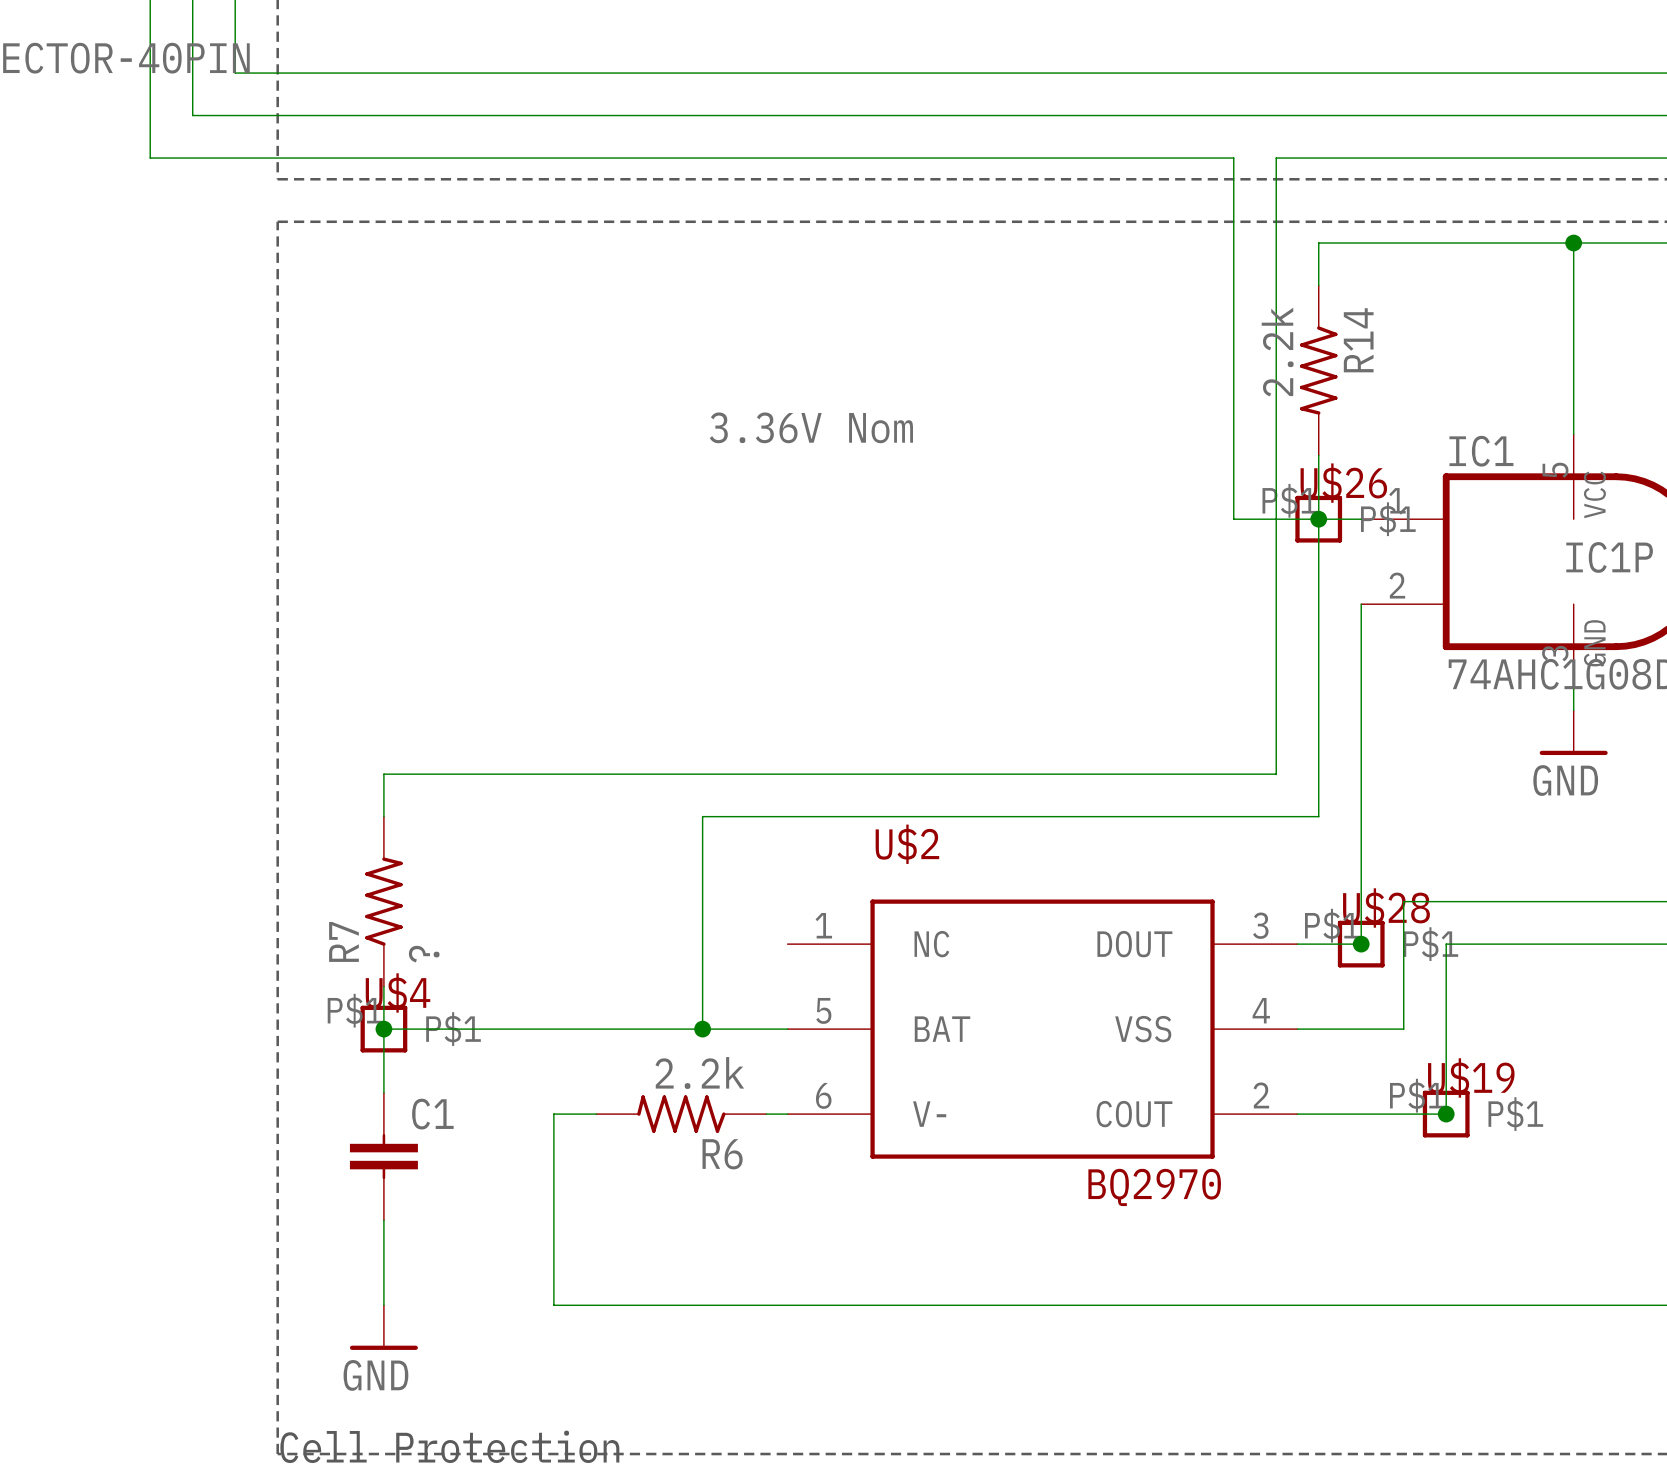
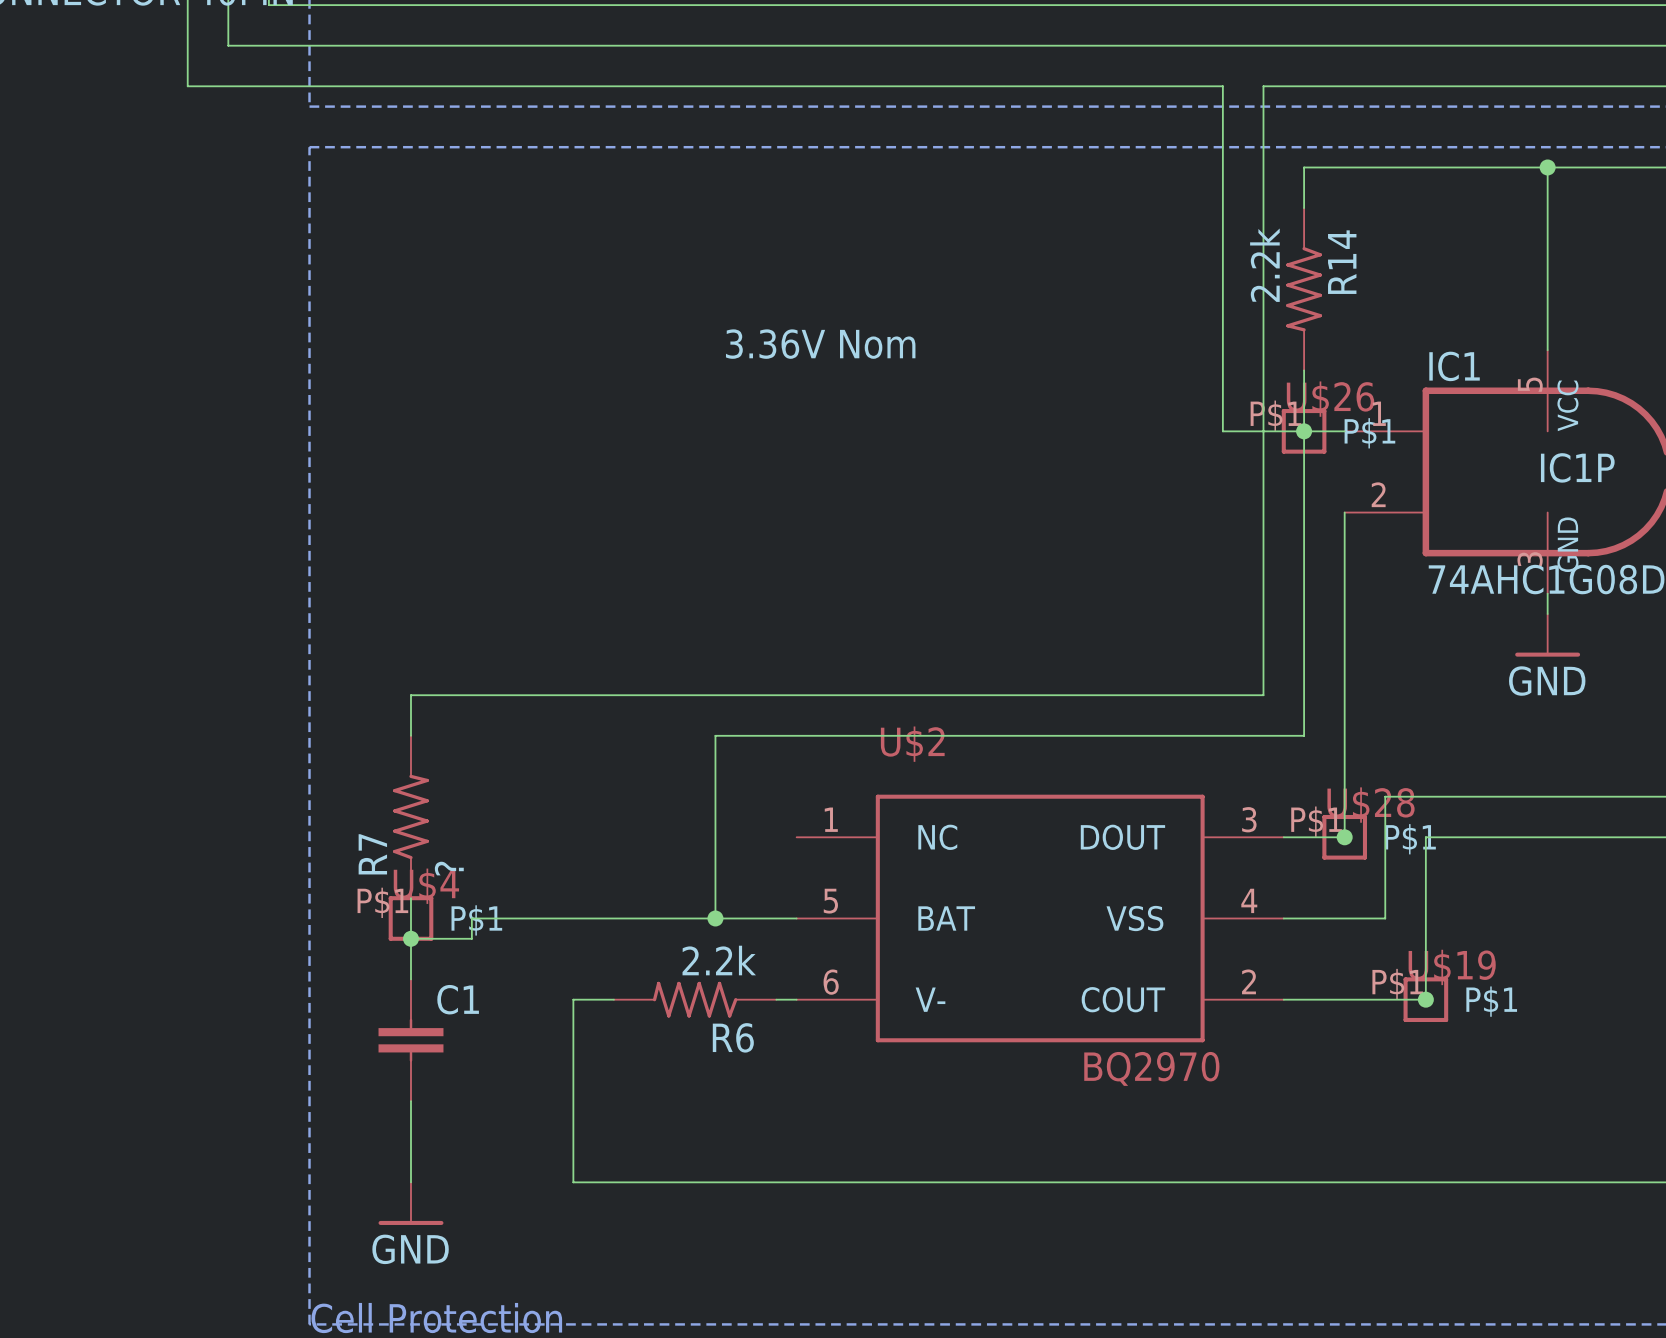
wire: (1276, 774) (383, 774) (383, 795) -> (1263, 674) (1263, 695) (410, 695)
wire: (1318, 816) (702, 816) (702, 837) -> (1304, 715) (1304, 735) (715, 735)
R7 position: (383, 901) -> (410, 817)
wire: (383, 1029) (447, 1029) -> (410, 938) (471, 938) (471, 918)
junction position: (383, 1029) -> (410, 938)

